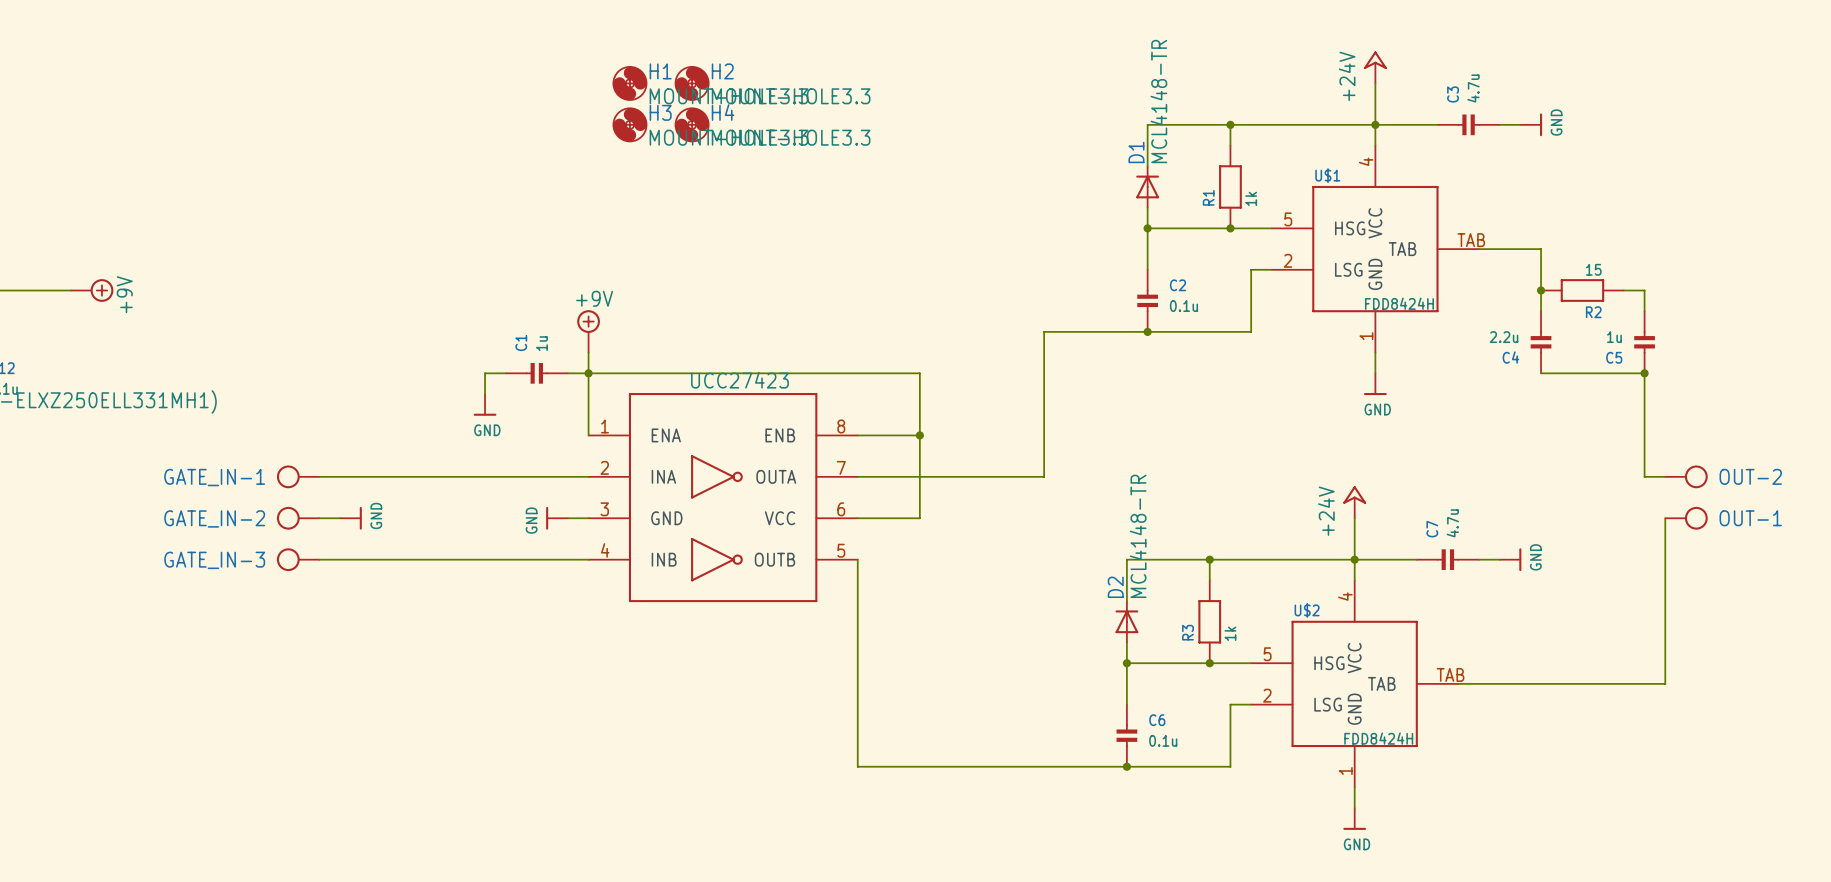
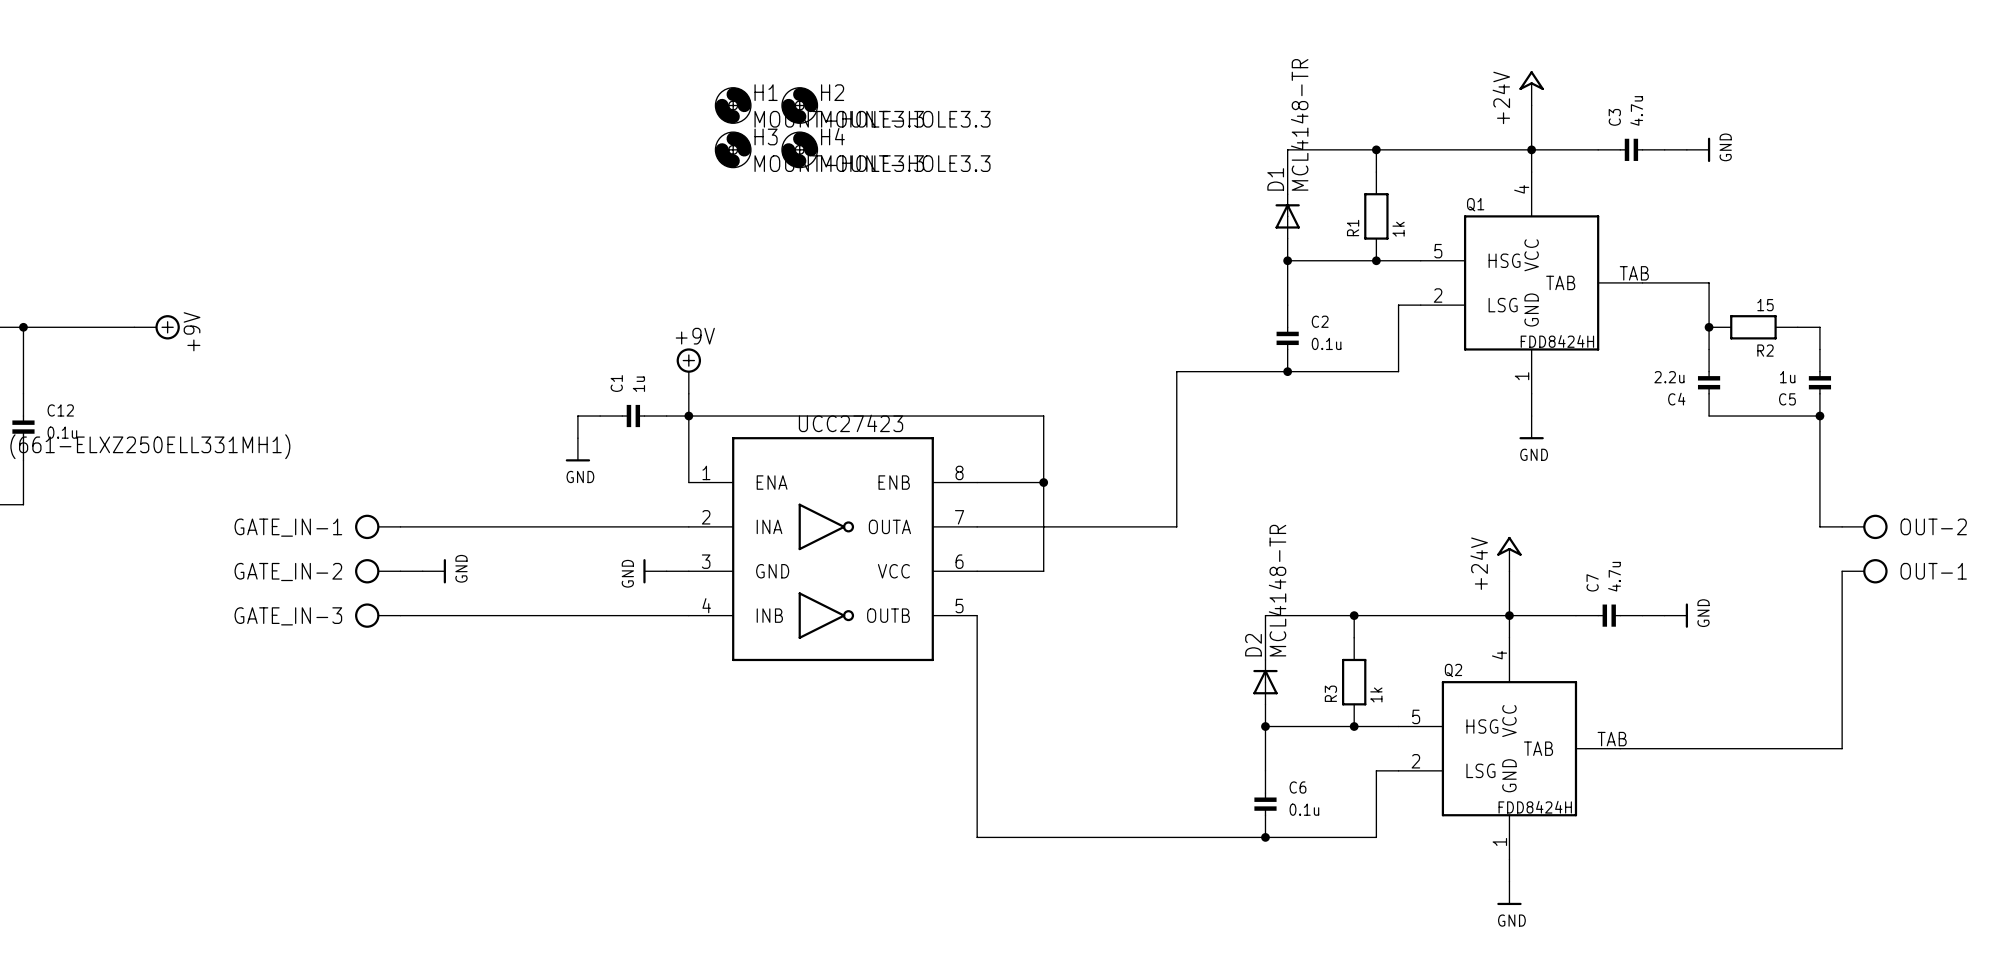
U$1 name: U$1 (1327, 175) -> Q1 (1475, 204)
U$2 name: U$2 (1307, 610) -> Q2 (1453, 670)

